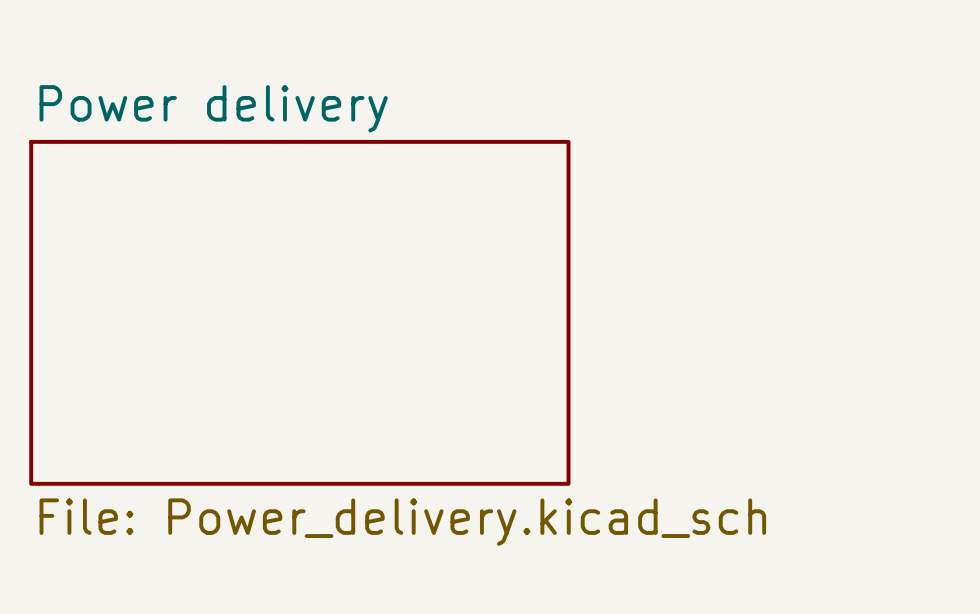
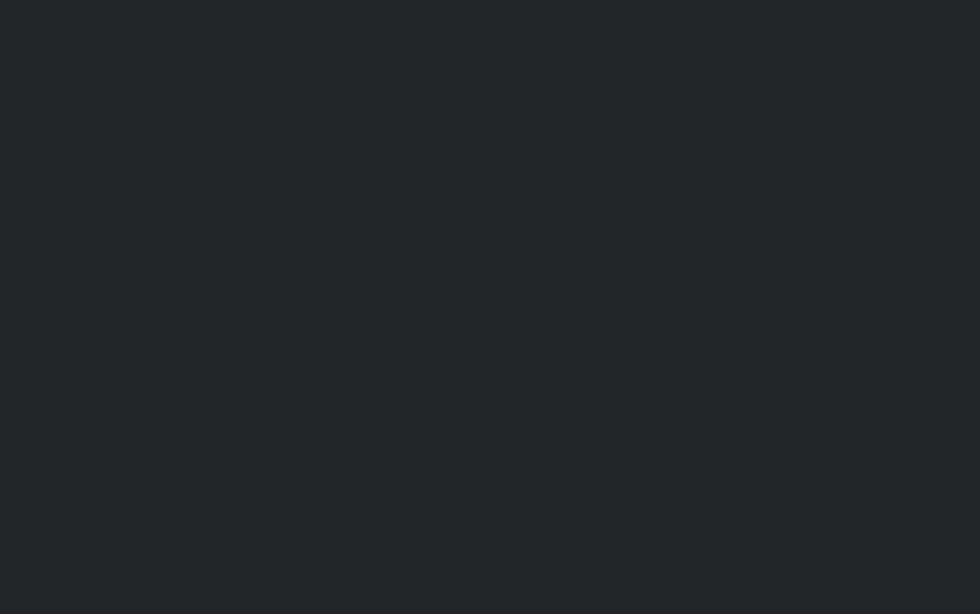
sheet Power delivery: File: Power_delivery.kicad_sch (299, 312) -> none

